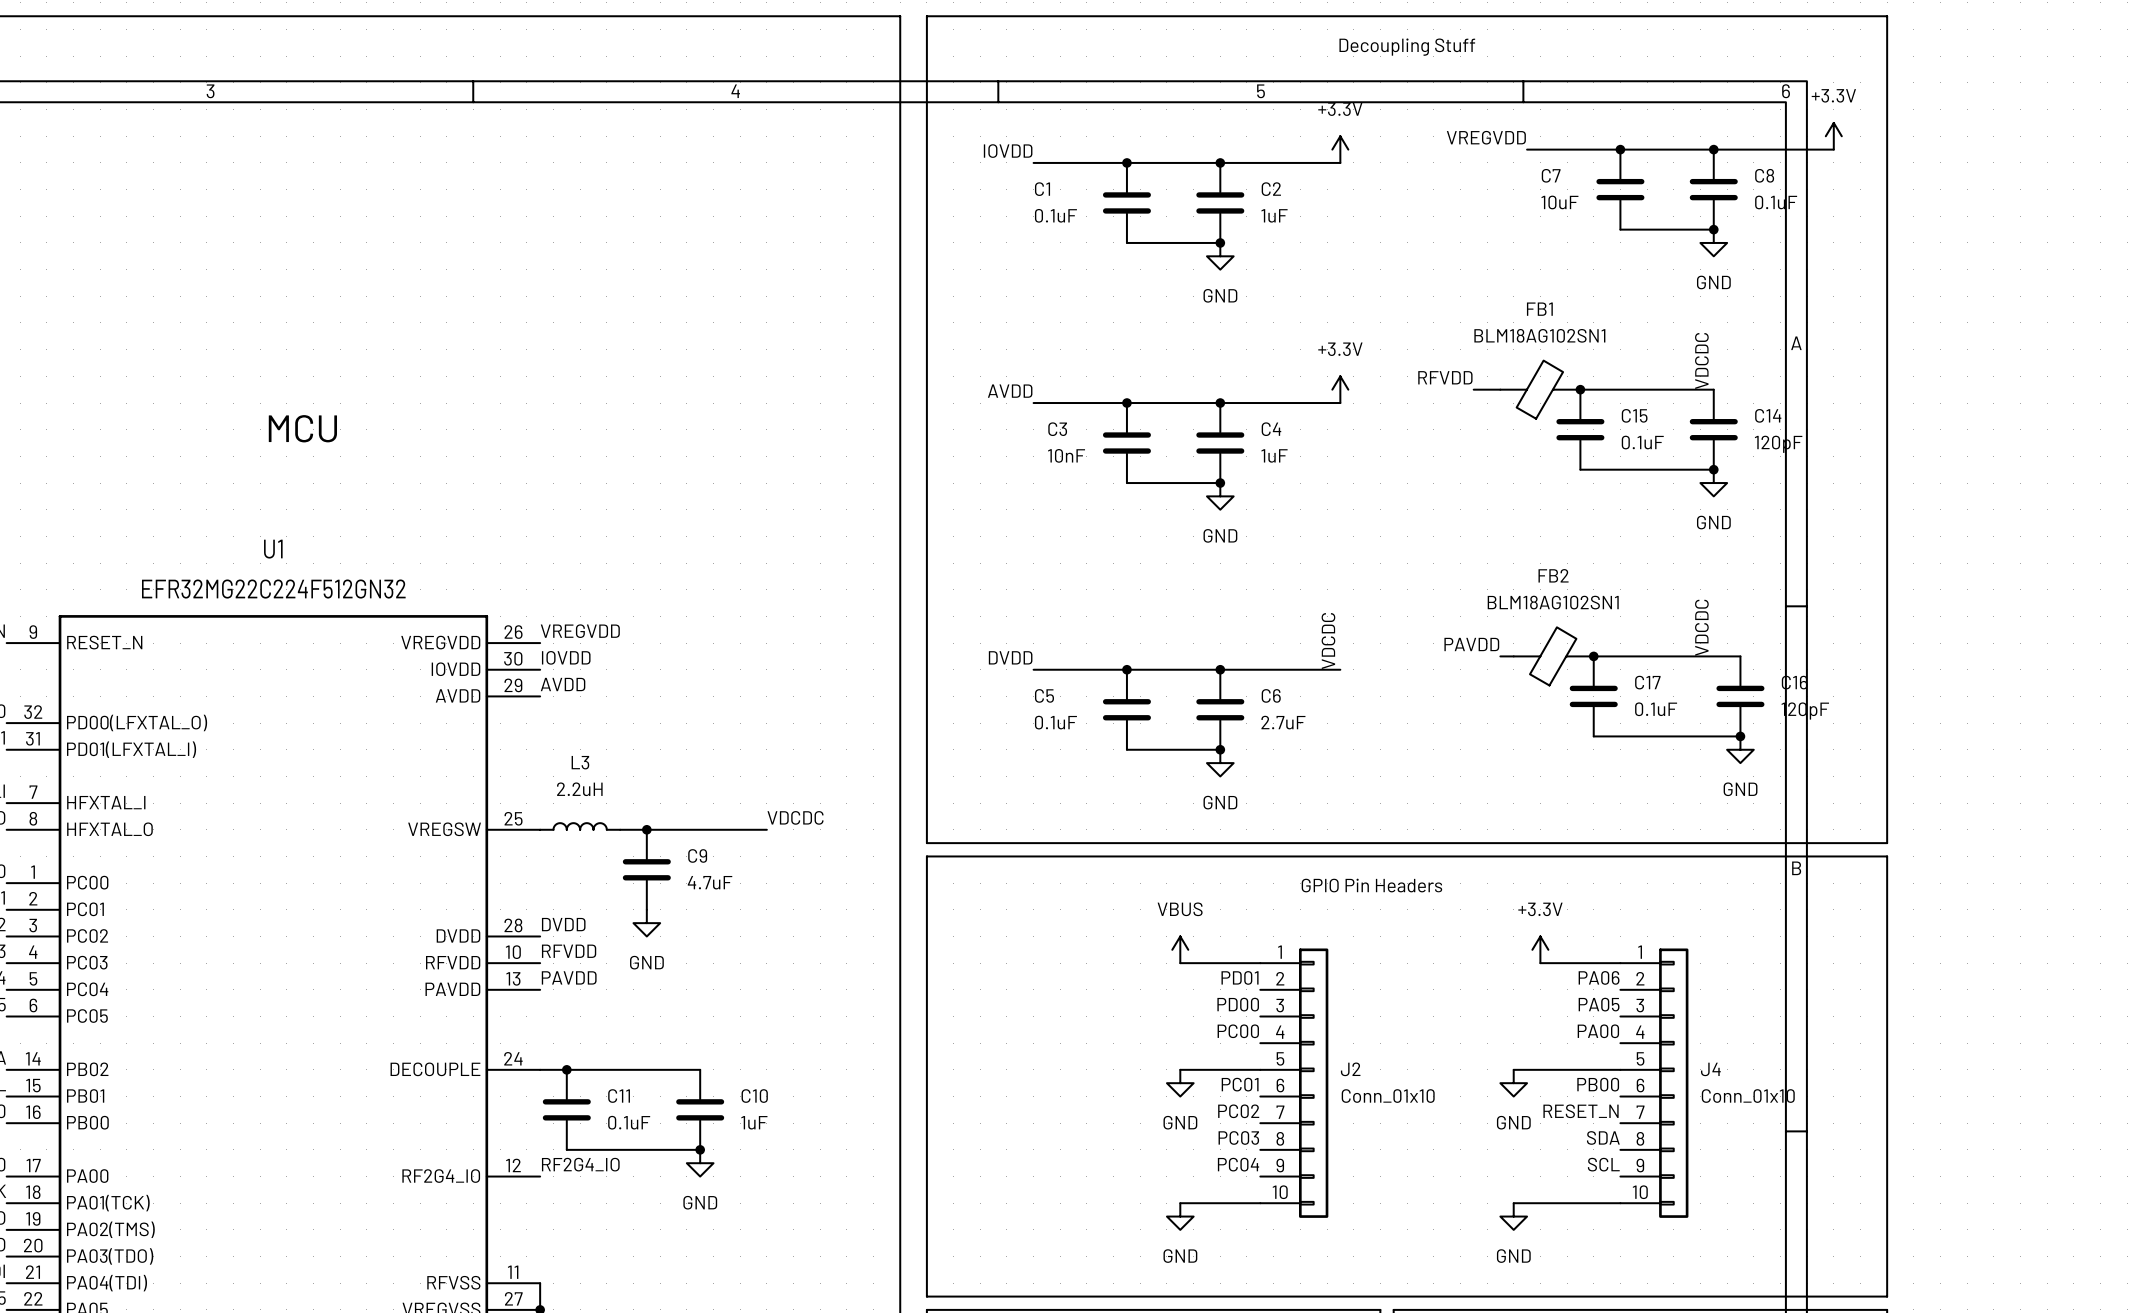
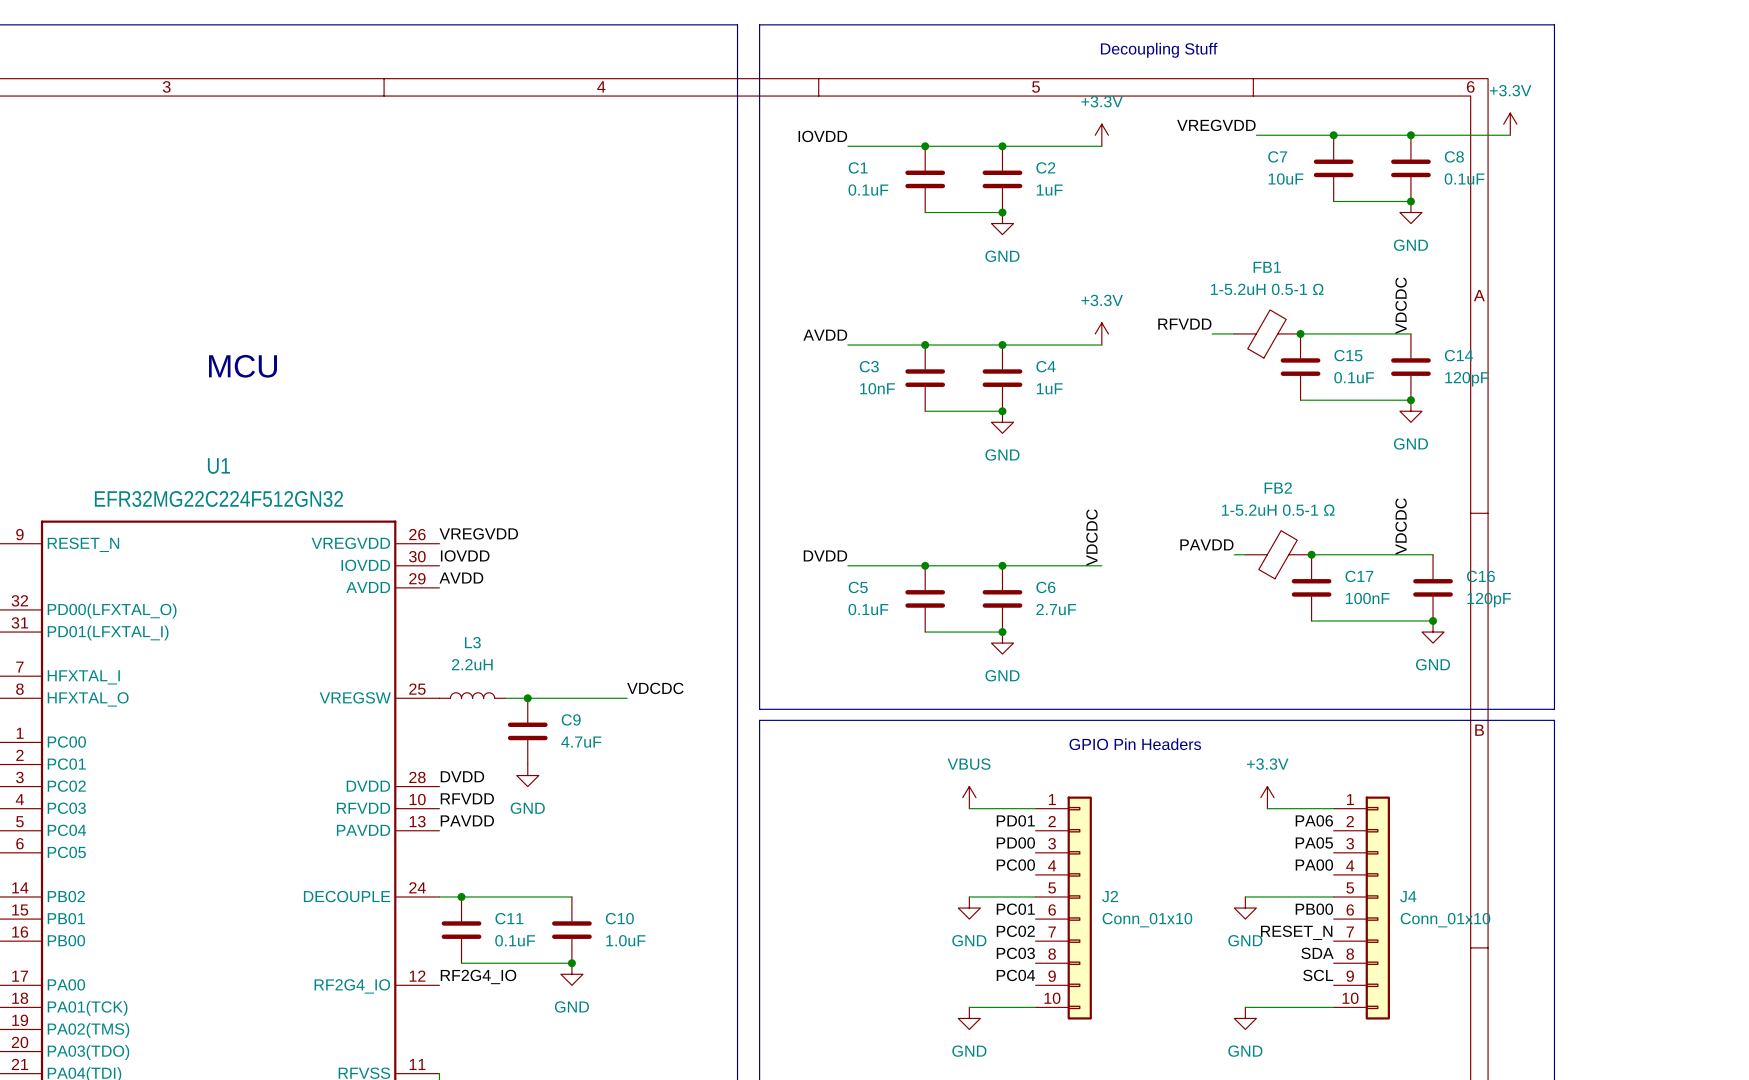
FB1 value: BLM18AG102SN1 (1539, 335) -> 1-5.2uH 0.5-1 Ω (1267, 289)
FB2 value: BLM18AG102SN1 (1553, 602) -> 1-5.2uH 0.5-1 Ω (1278, 510)
C17 value: 0.1uF (1656, 709) -> 100nF (1367, 598)
C10 value: 1uF (754, 1122) -> 1.0uF (625, 940)

